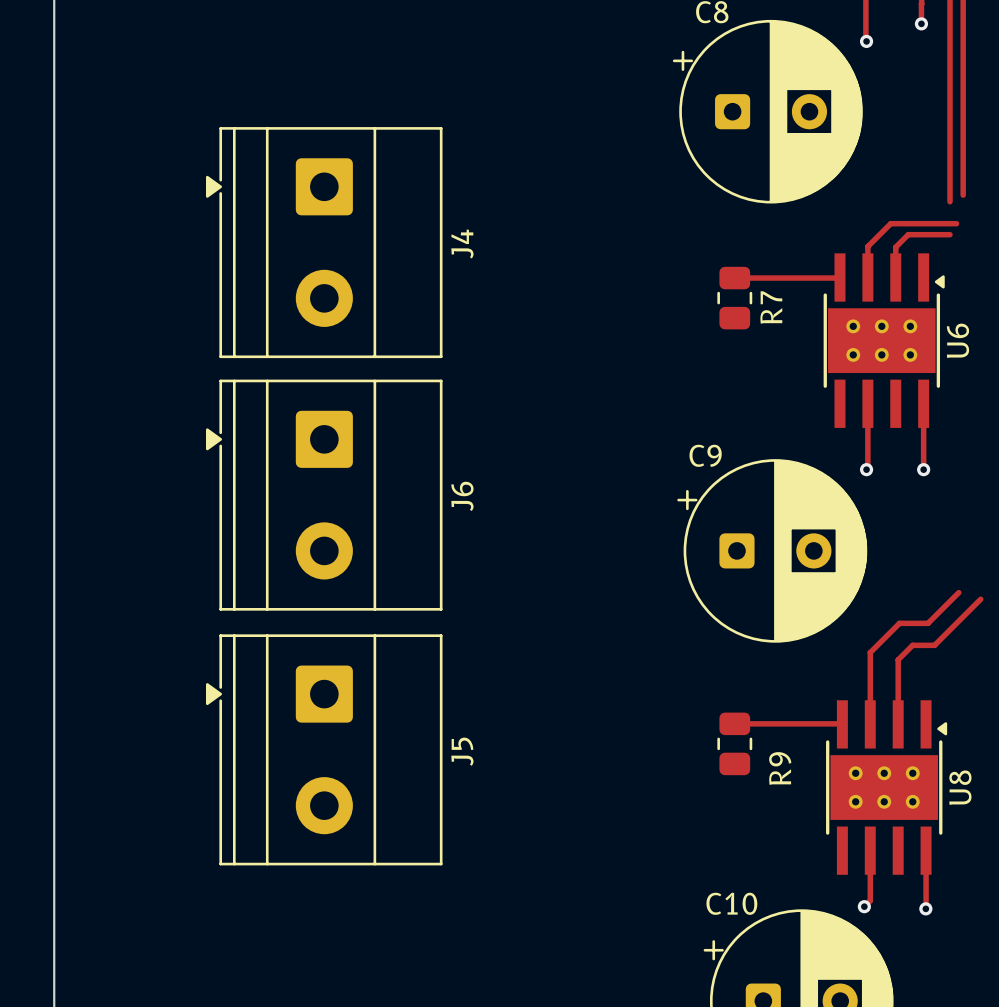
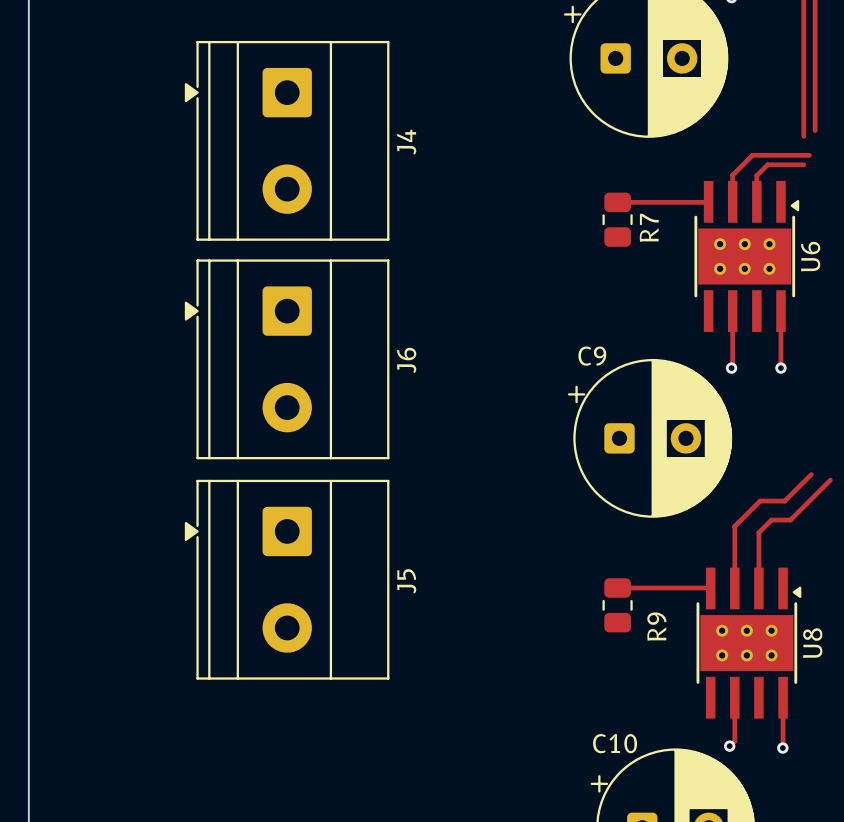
J4 position: (324, 242) -> (287, 140)
J6 position: (324, 495) -> (287, 359)
J5 position: (324, 749) -> (287, 579)

